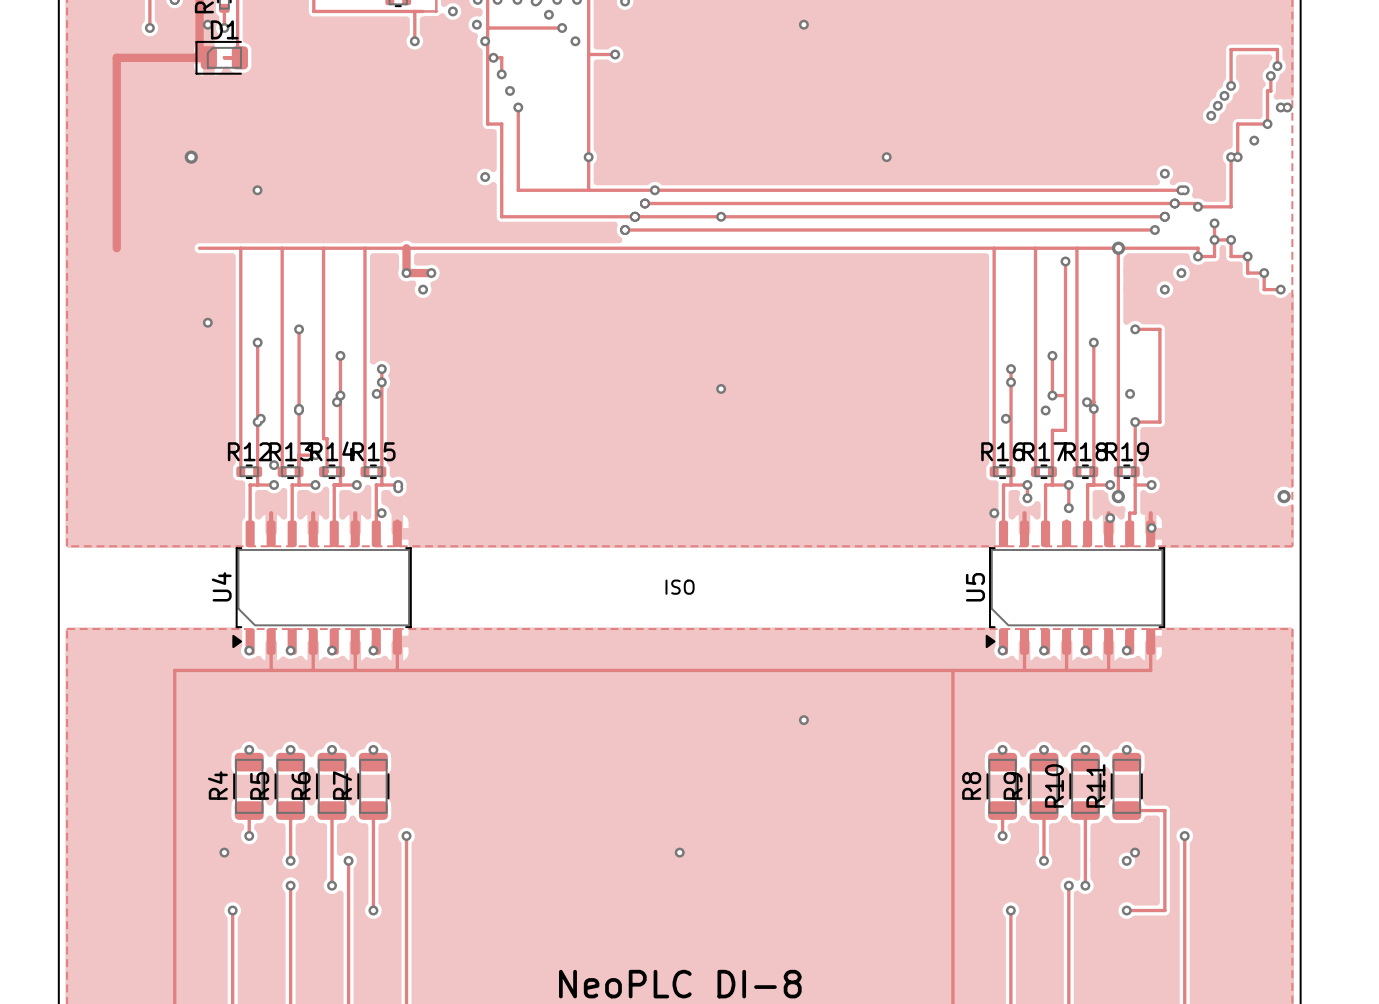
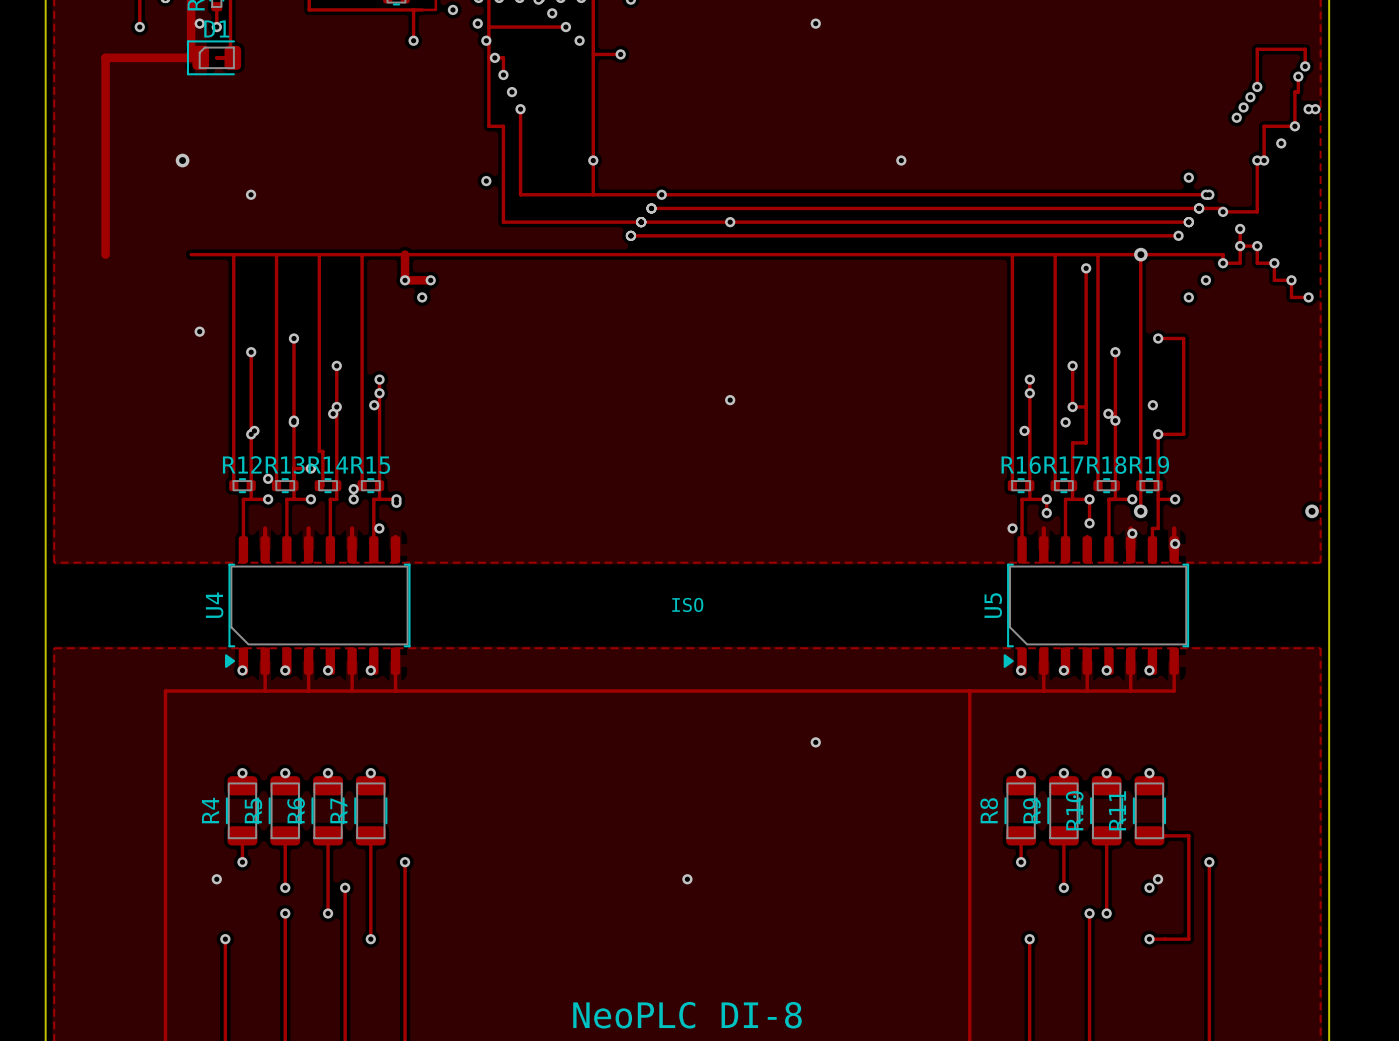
via: none -> (353, 489)
track: (340, 485) (356, 485) -> none

